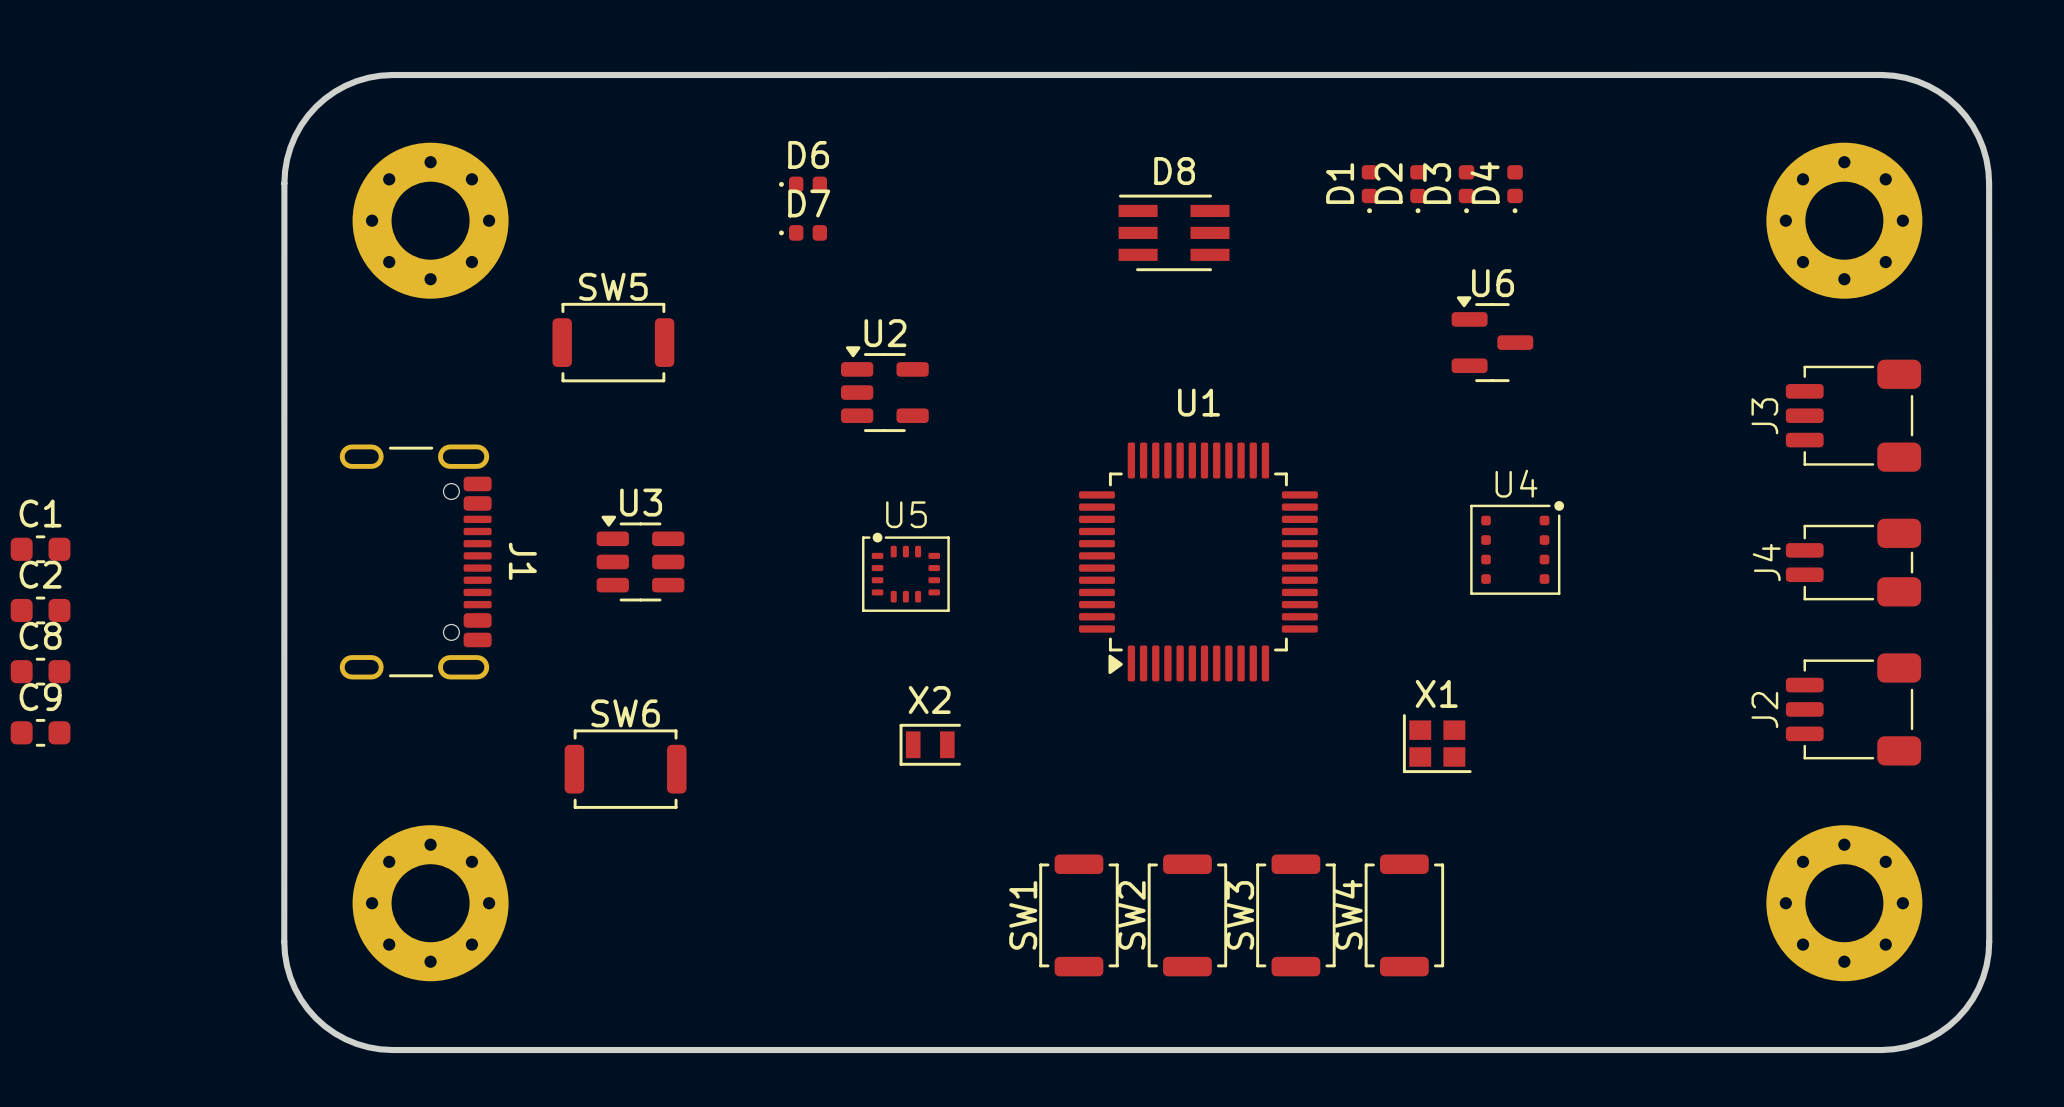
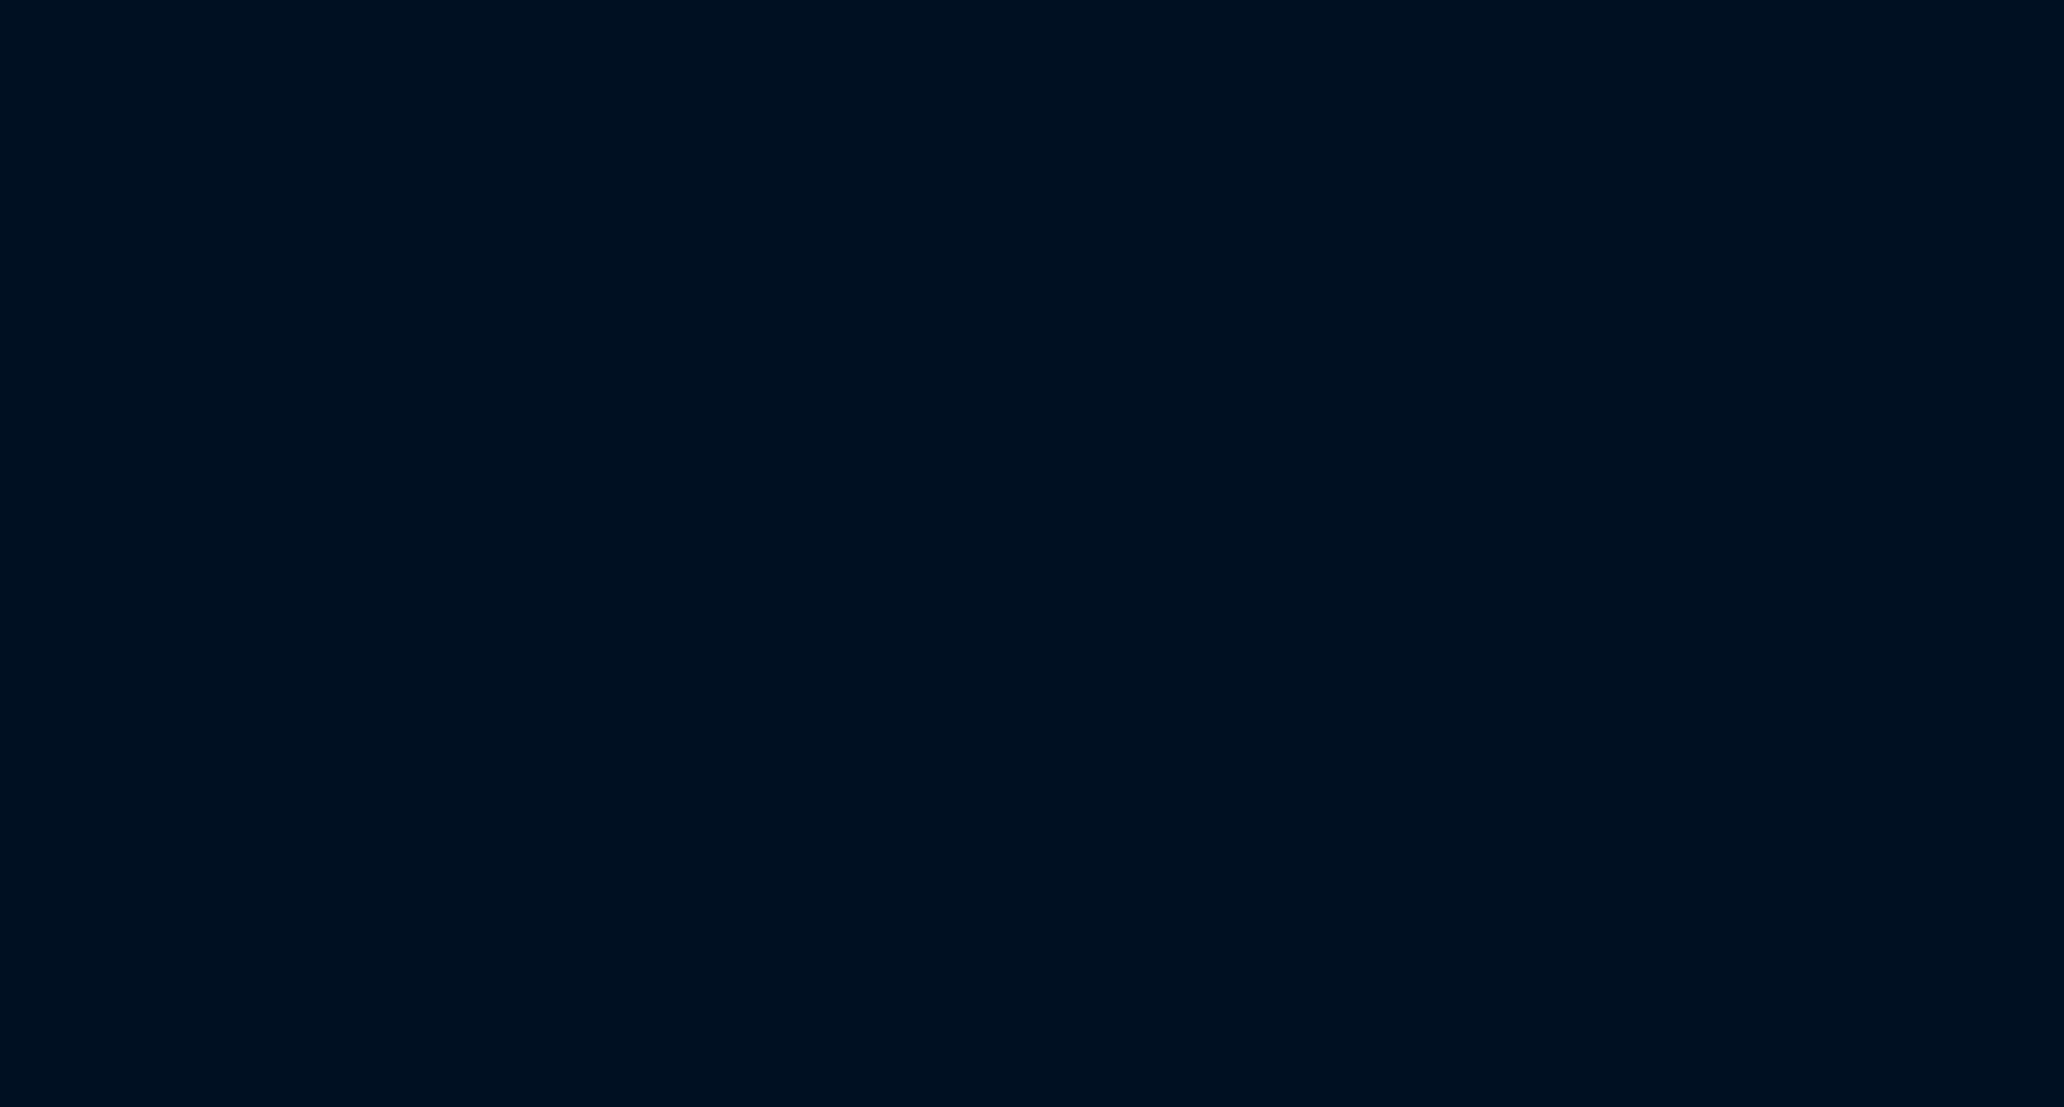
board edge: (392, 75) (1881, 74) (1917, 81) (1938, 91) (1957, 107) (1972, 125) (1983, 147) (1989, 183) (1989, 941) (1986, 965) (1972, 999) (1957, 1017) (1939, 1033) (1917, 1043) (1881, 1050) (392, 1050) (356, 1043) (334, 1033) (316, 1018) (300, 999) (290, 977) (284, 953) (285, 171) (295, 136) (308, 115) (325, 98) (356, 81) (392, 75) -> none
D6: (803, 184) -> none
D1: (1369, 189) -> none
D2: (1418, 189) -> none
D3: (1466, 189) -> none
D4: (1515, 189) -> none
part: (430, 220) -> none
part: (1844, 220) -> none
D7: (803, 232) -> none
D8: (1174, 232) -> none
U6: (1492, 339) -> none
SW5: (613, 342) -> none
U2: (884, 389) -> none
J3: (1853, 415) -> none
U4: (1517, 547) -> none
C1: (40, 549) -> none
U3: (640, 558) -> none
J1: (415, 561) -> none
U1: (1198, 561) -> none
J4: (1853, 562) -> none
U5: (905, 572) -> none
C2: (40, 610) -> none
C8: (40, 671) -> none
J2: (1853, 709) -> none
C9: (40, 732) -> none
X1: (1437, 743) -> none
X2: (930, 744) -> none
SW6: (625, 769) -> none
part: (430, 903) -> none
part: (1844, 903) -> none
SW1: (1078, 915) -> none
SW2: (1187, 915) -> none
SW3: (1295, 915) -> none
SW4: (1404, 915) -> none

